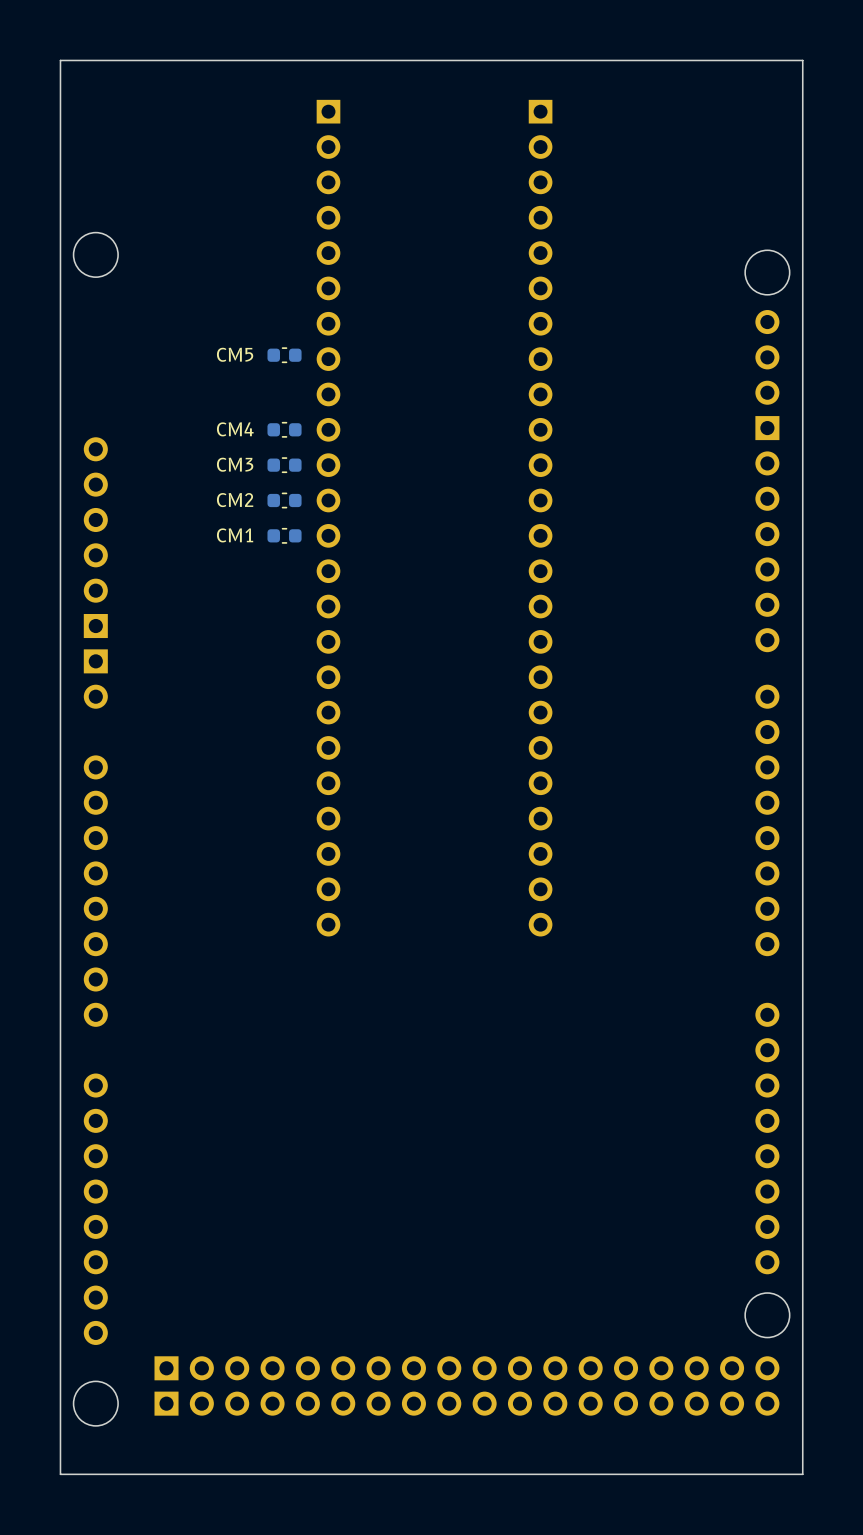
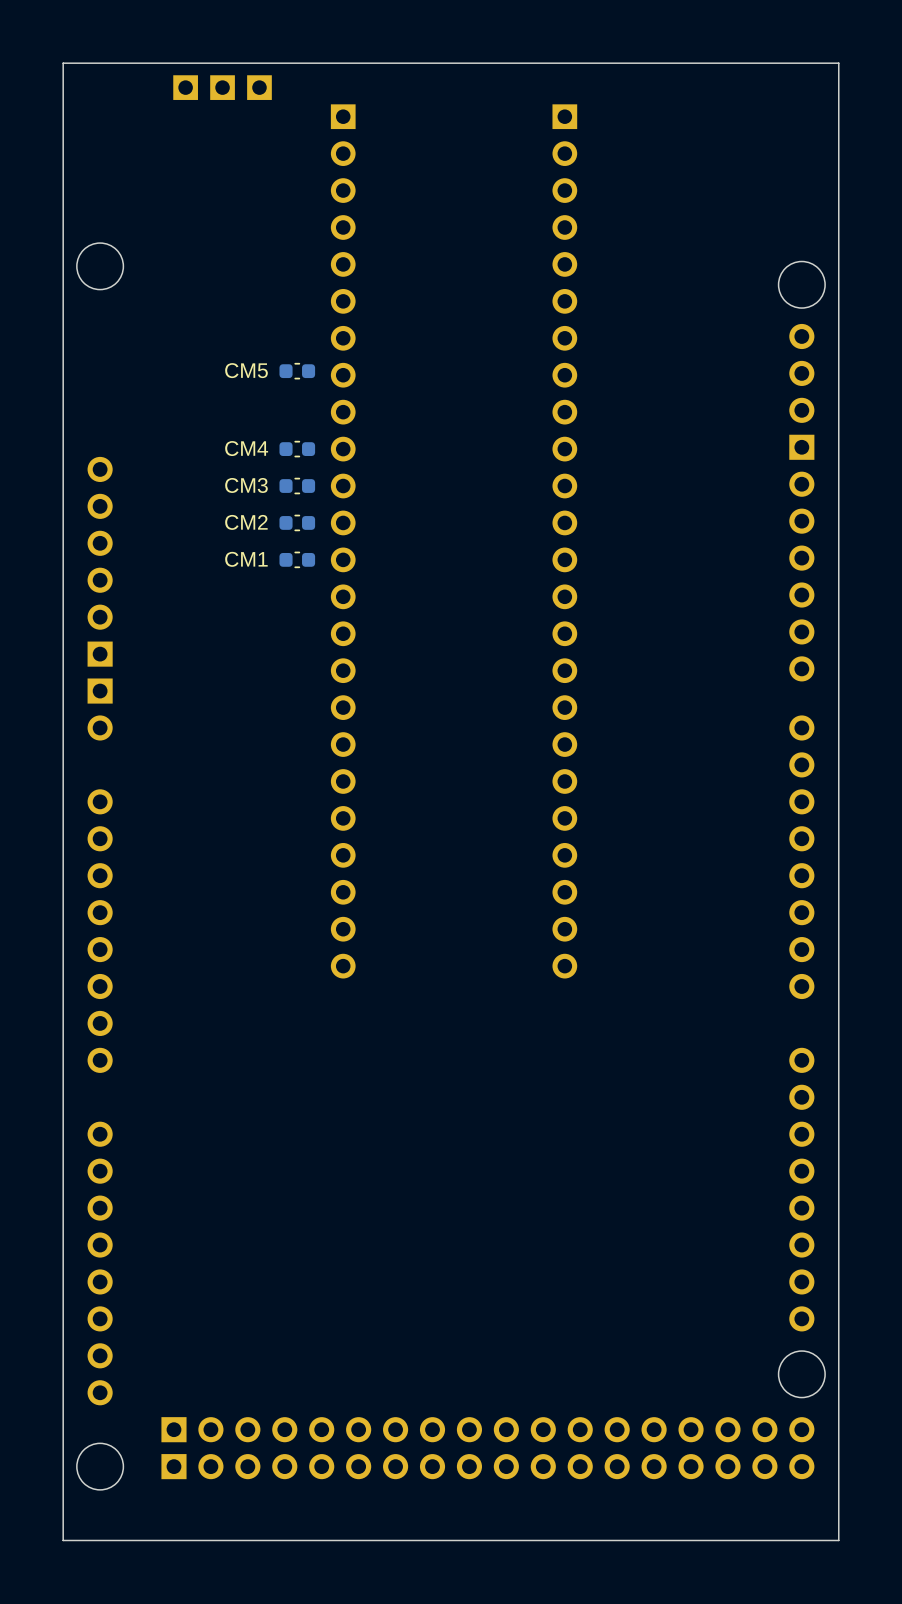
part: none -> (185, 87)
part: none -> (222, 87)
part: none -> (259, 87)

